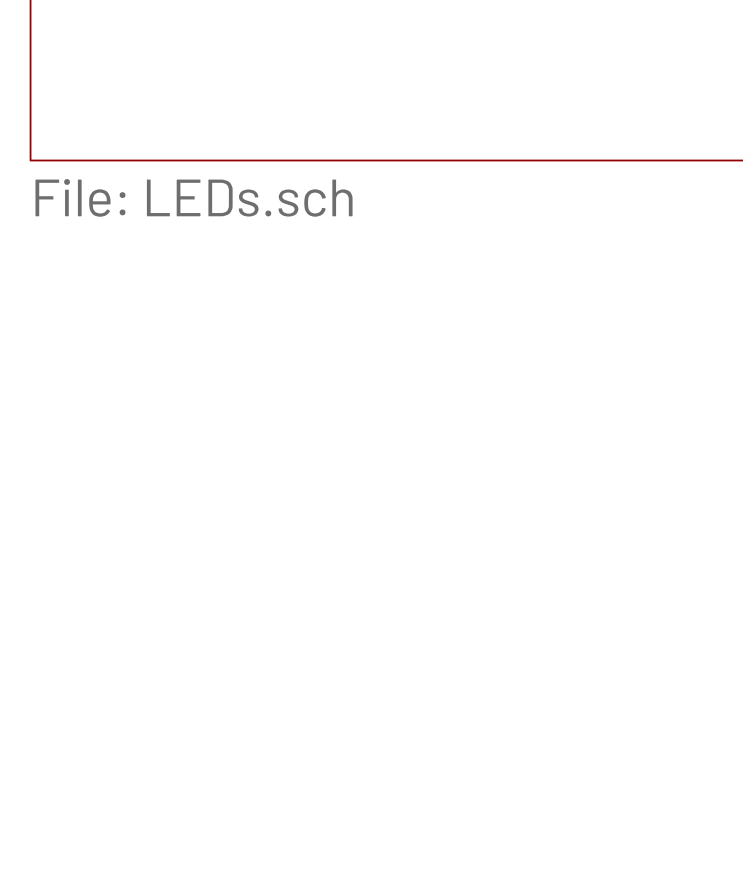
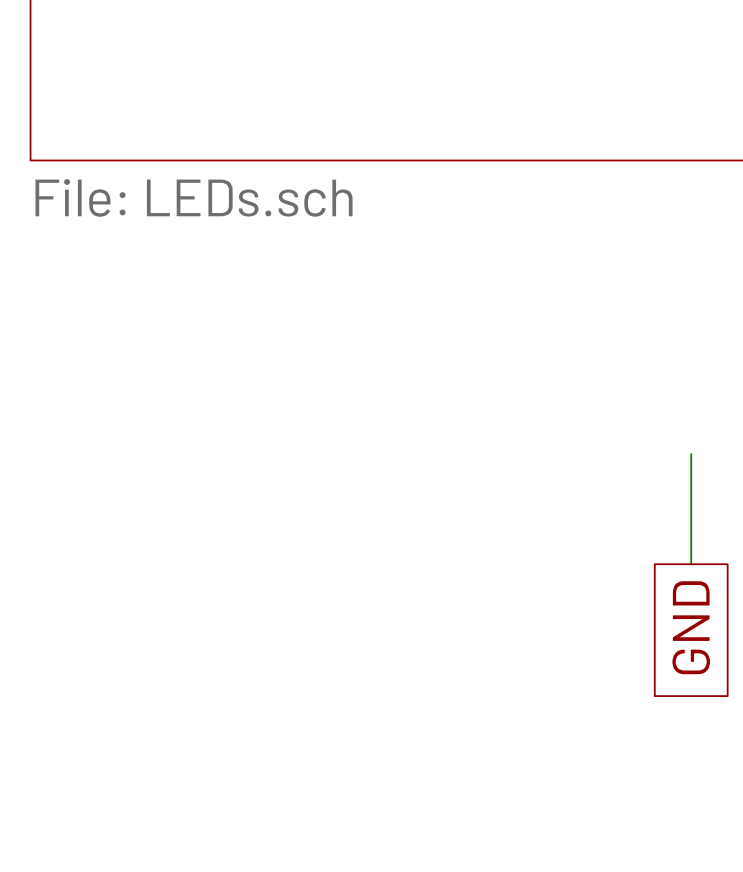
wire: none -> (691, 454) (691, 564)
global label: none -> GND (691, 627)

